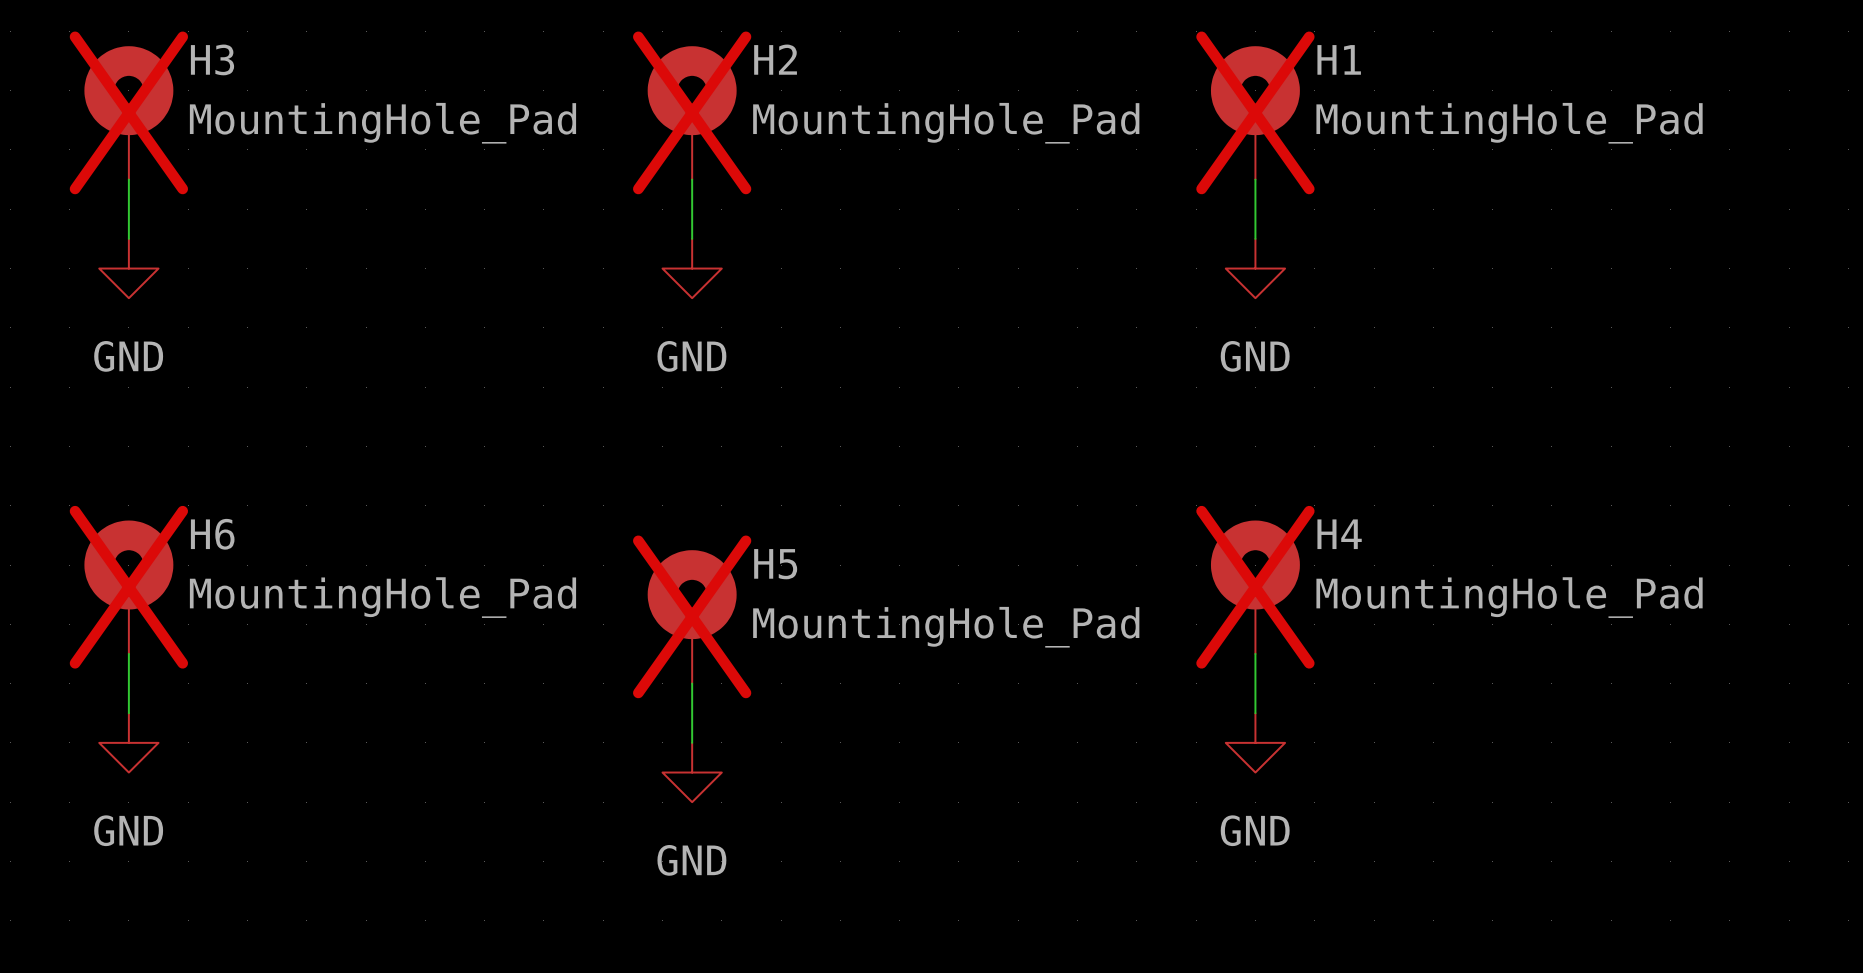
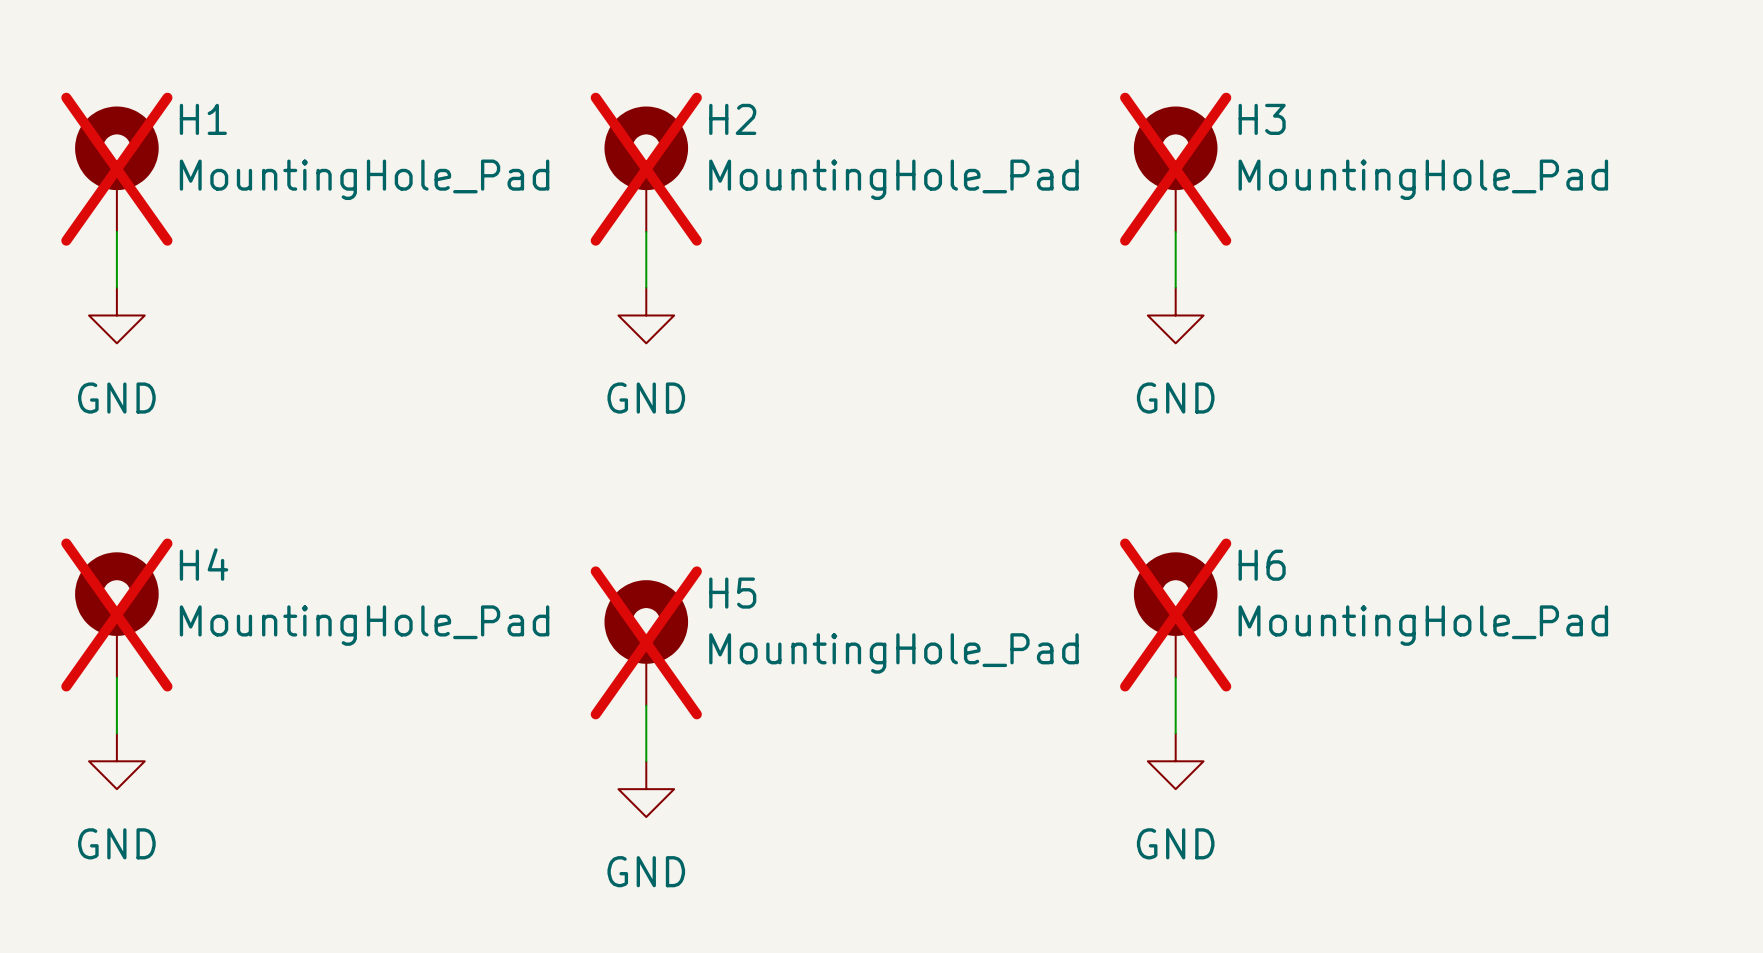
H3 name: H3 (212, 59) -> H1 (203, 119)
H1 name: H1 (1339, 59) -> H3 (1262, 119)
H6 name: H6 (212, 534) -> H4 (204, 564)
H4 name: H4 (1339, 534) -> H6 (1262, 565)

